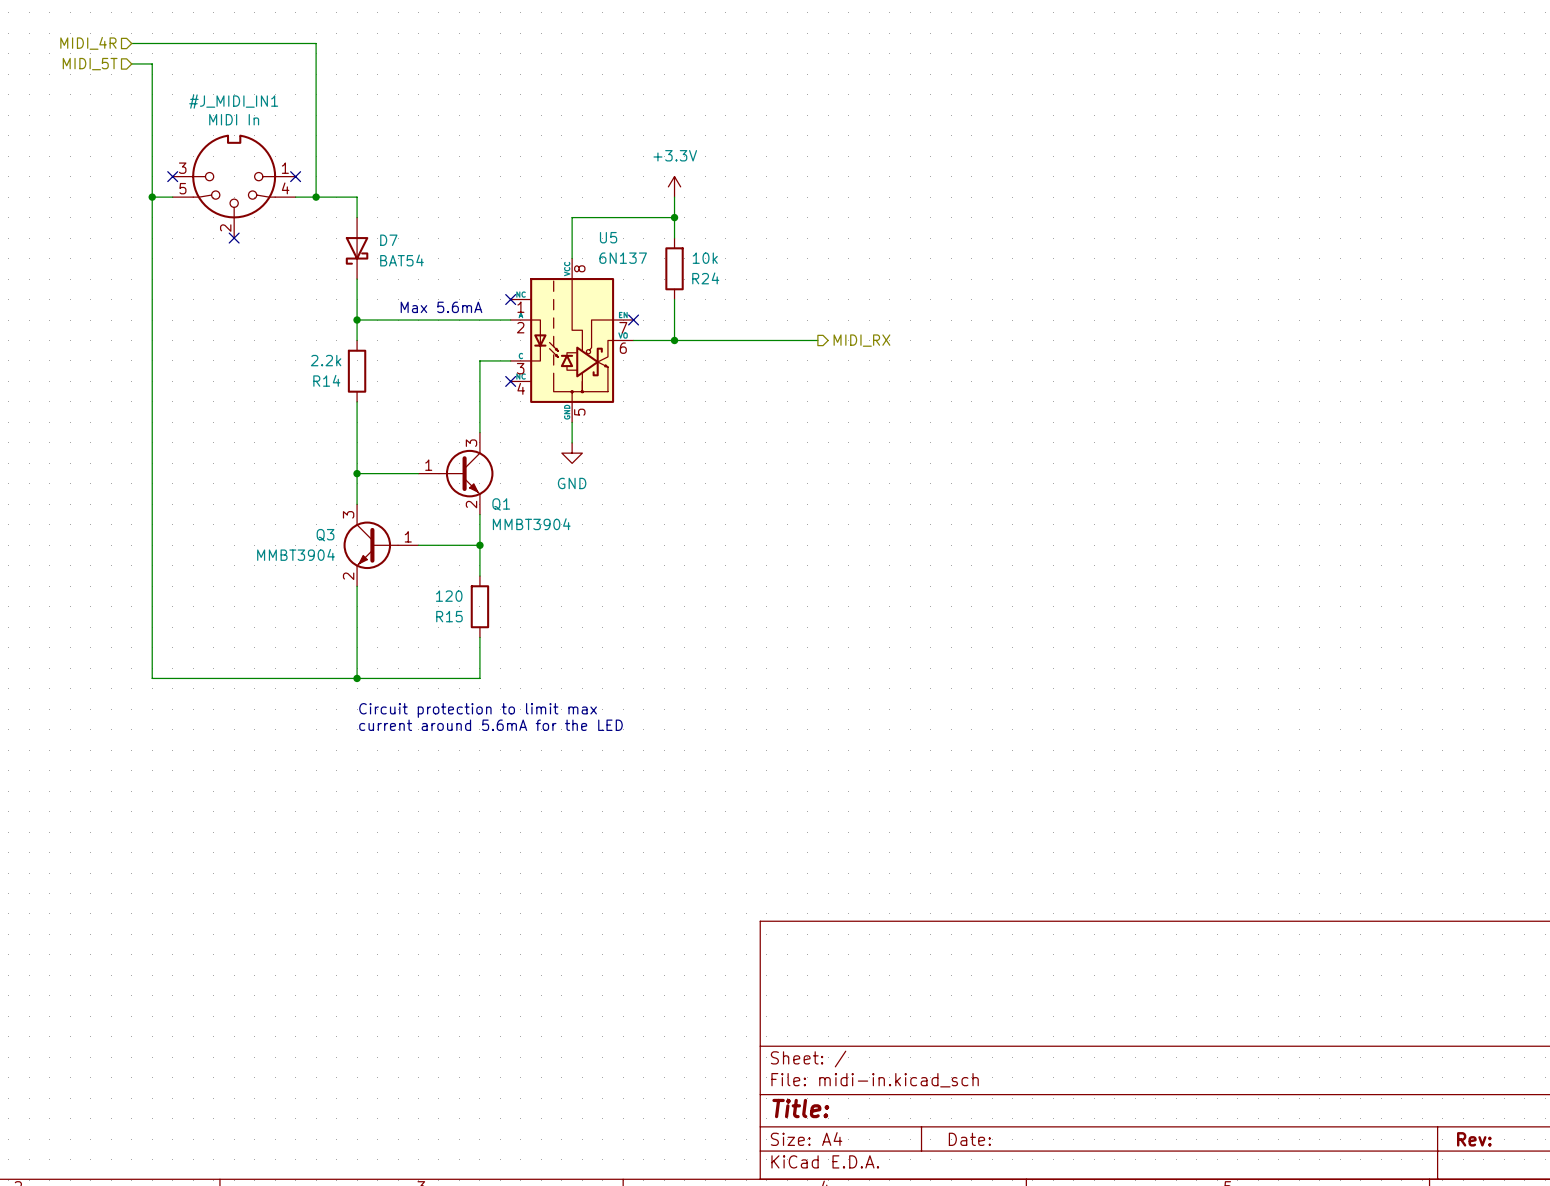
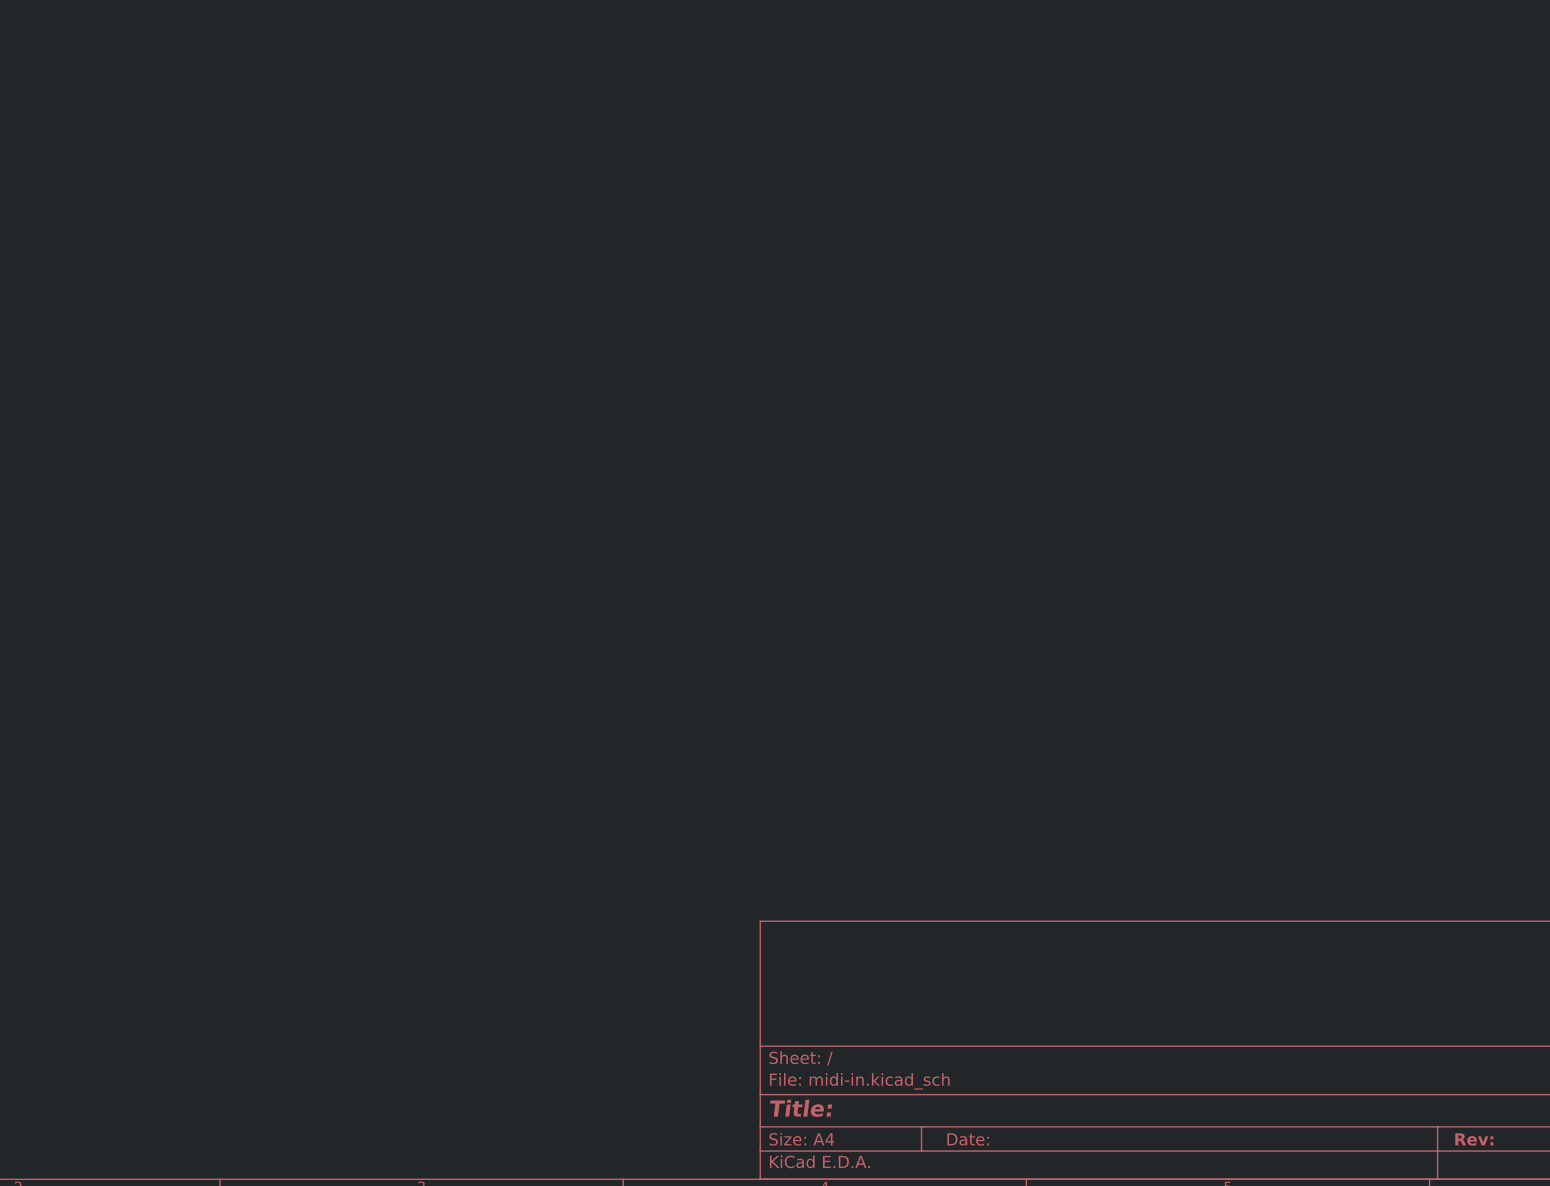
hierarchical label: MIDI_4R (88, 43) -> none
wire: (131, 43) (316, 43) (316, 197) -> none
wire: (131, 63) (152, 63) (152, 678) (479, 678) (479, 637) -> none
hierarchical label: MIDI_5T (90, 64) -> none
no-connect mark: (172, 176) -> none
no-connect mark: (295, 176) -> none
#J_MIDI_IN1: MIDI In (234, 186) -> none
power symbol: +3.3V (674, 186) -> none
wire: (152, 197) (172, 197) -> none
junction: (152, 197) -> none
wire: (295, 197) (357, 197) (357, 217) -> none
junction: (316, 197) -> none
wire: (674, 197) (674, 238) -> none
wire: (674, 217) (572, 217) (572, 258) -> none
junction: (674, 217) -> none
no-connect mark: (234, 238) -> none
D7: BAT54 (357, 248) -> none
R24: 10k (674, 268) -> none
wire: (357, 279) (357, 340) -> none
no-connect mark: (510, 299) -> none
wire: (674, 299) (674, 340) -> none
text: Max 5.6mA (441, 307) -> none
wire: (357, 320) (510, 320) -> none
junction: (357, 320) -> none
no-connect mark: (633, 320) -> none
U5: 6N137 (572, 340) -> none
wire: (633, 340) (817, 340) -> none
junction: (674, 340) -> none
hierarchical label: MIDI_RX (861, 340) -> none
wire: (510, 360) (479, 360) (479, 432) -> none
R14: 2.2k (357, 371) -> none
no-connect mark: (510, 381) -> none
wire: (357, 401) (357, 504) -> none
wire: (572, 422) (572, 442) -> none
power symbol: GND (572, 453) -> none
wire: (357, 473) (418, 473) -> none
junction: (357, 473) -> none
Q1: MMBT3904 (455, 473) -> none
wire: (479, 514) (479, 576) -> none
Q3: MMBT3904 (381, 545) -> none
wire: (418, 545) (479, 545) -> none
junction: (479, 545) -> none
wire: (357, 586) (357, 678) -> none
R15: 120 (479, 606) -> none
junction: (357, 678) -> none
text: Circuit protection to limit max (478, 710) -> none
text: current around 5.6mA for the LED (490, 725) -> none

